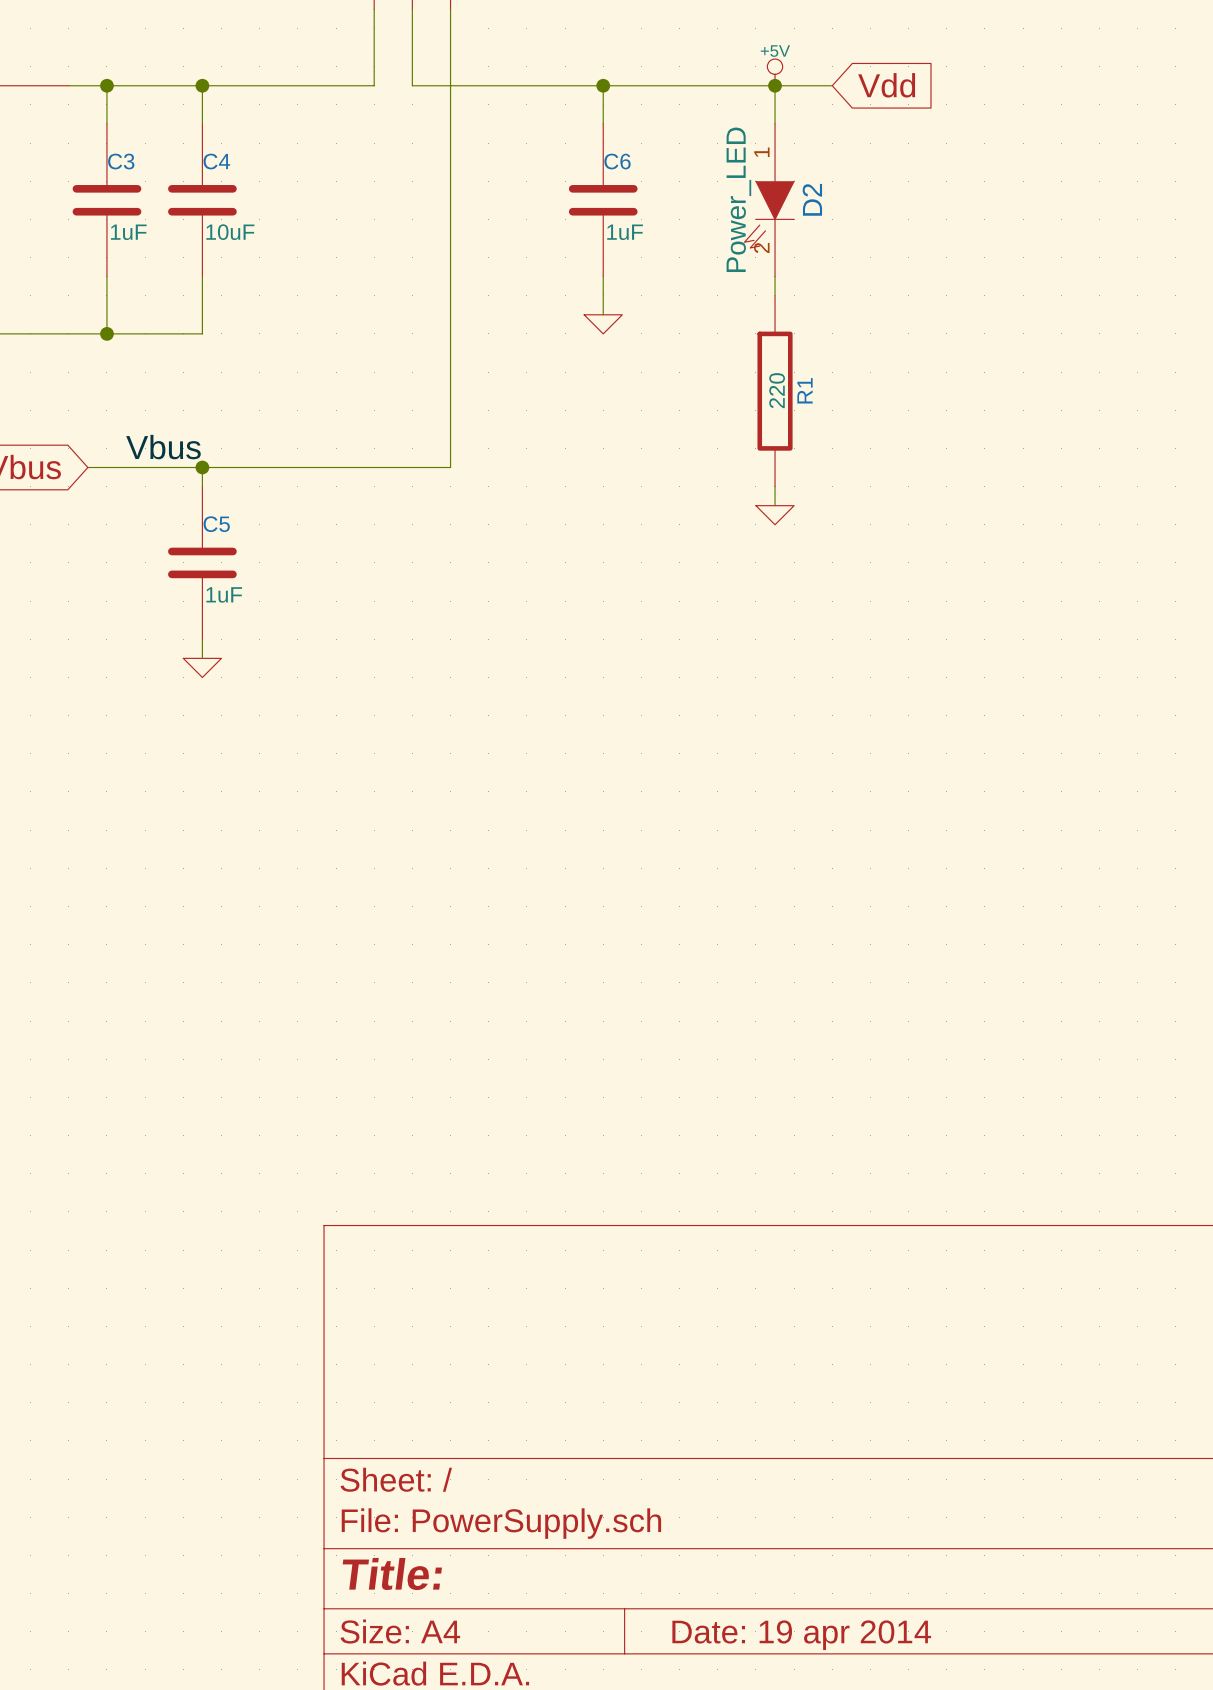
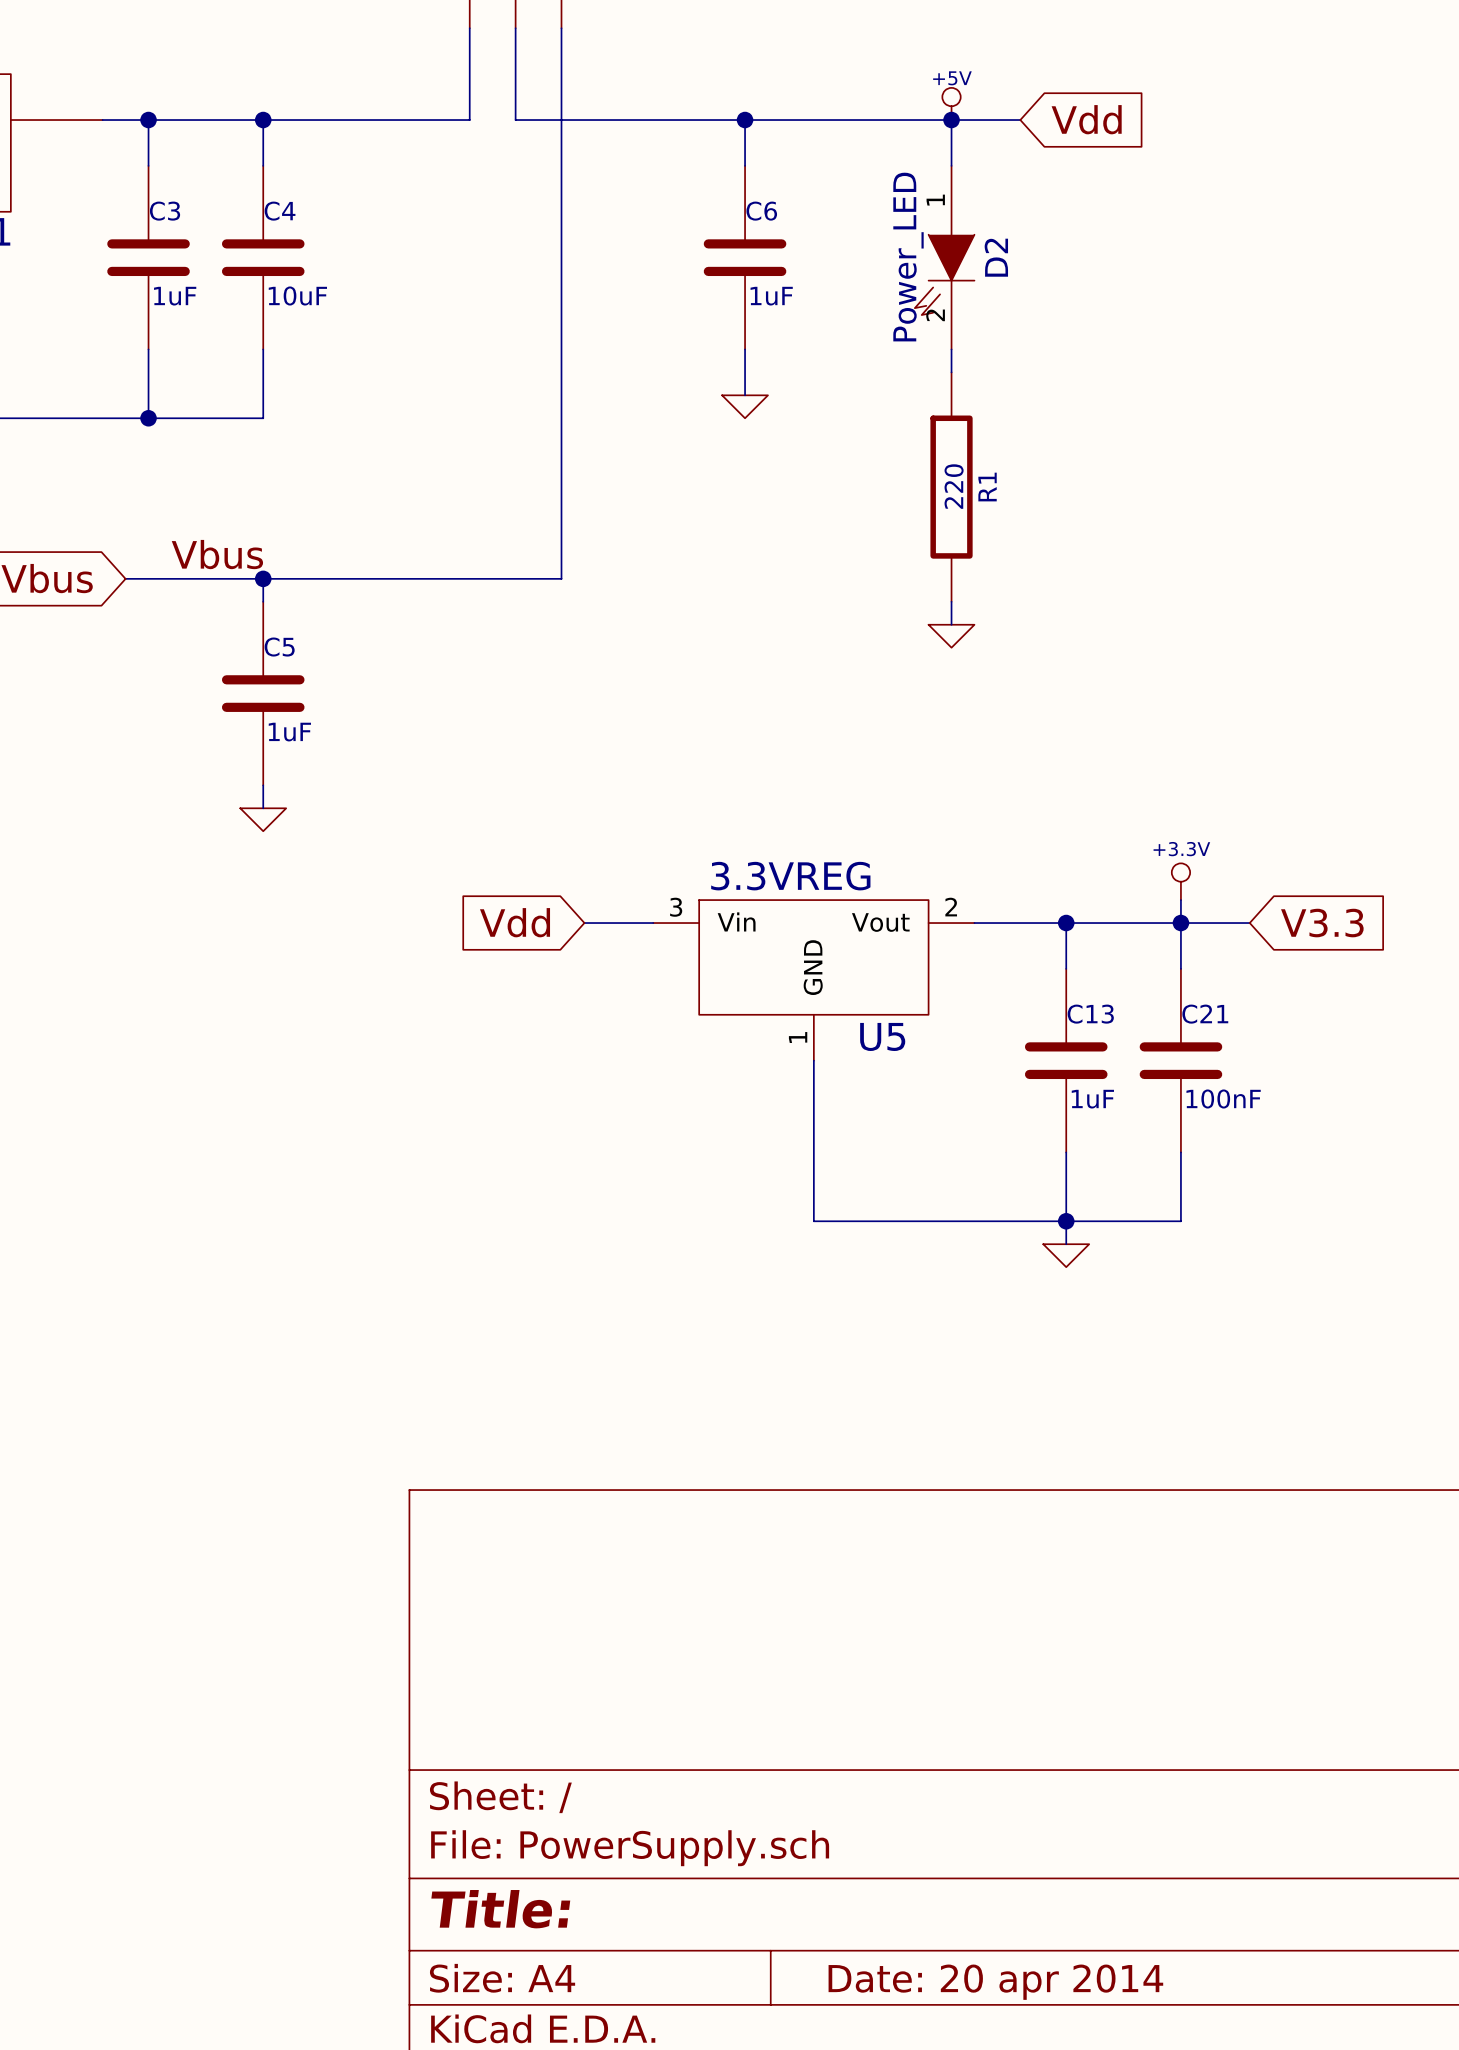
power symbol: none -> +3.3V (1180, 881)
wire: none -> (1180, 900) (1180, 968)
global label: none -> Vdd (515, 922)
wire: none -> (584, 923) (653, 923)
wire: none -> (974, 923) (1249, 923)
wire: none -> (1066, 923) (1066, 968)
junction: none -> (1066, 923)
junction: none -> (1180, 923)
global label: none -> V3.3 (1322, 923)
U5: none -> 3.3VREG (813, 980)
wire: none -> (813, 1060) (813, 1221) (1180, 1221) (1180, 1152)
C13: none -> 1uF (1066, 1060)
C21: none -> 100nF (1180, 1060)
wire: none -> (1066, 1152) (1066, 1244)
junction: none -> (1066, 1221)
power symbol: none -> (1066, 1255)
title block: Date: 19 apr 2014 (801, 1635) -> Date: 20 apr 2014 (995, 1982)

